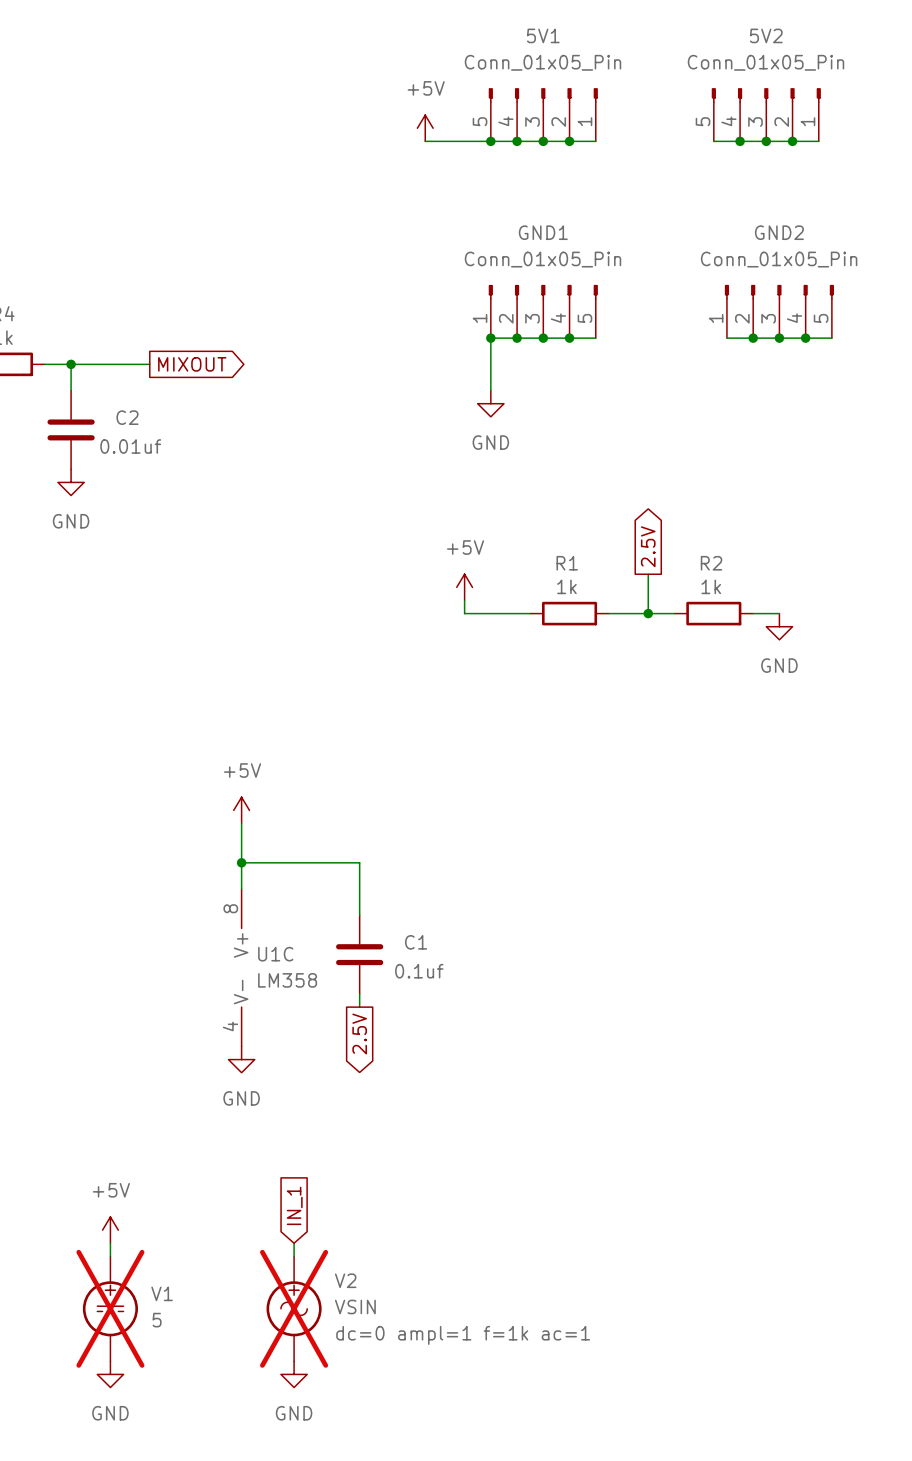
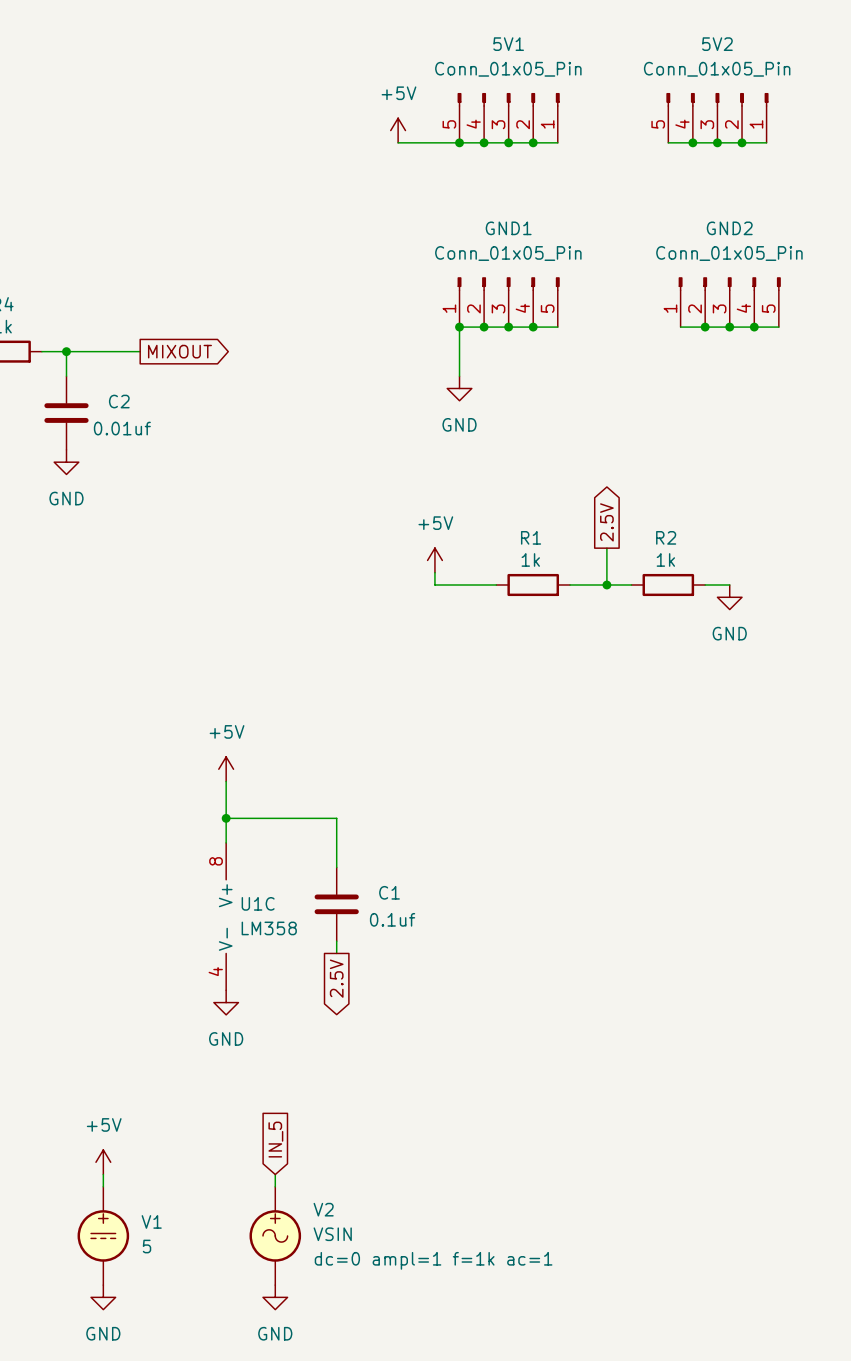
global label: IN_1 (294, 1205) -> IN_5 (275, 1139)
V1 do-not-place cross: (110, 1308) -> none
V2 do-not-place cross: (294, 1308) -> none

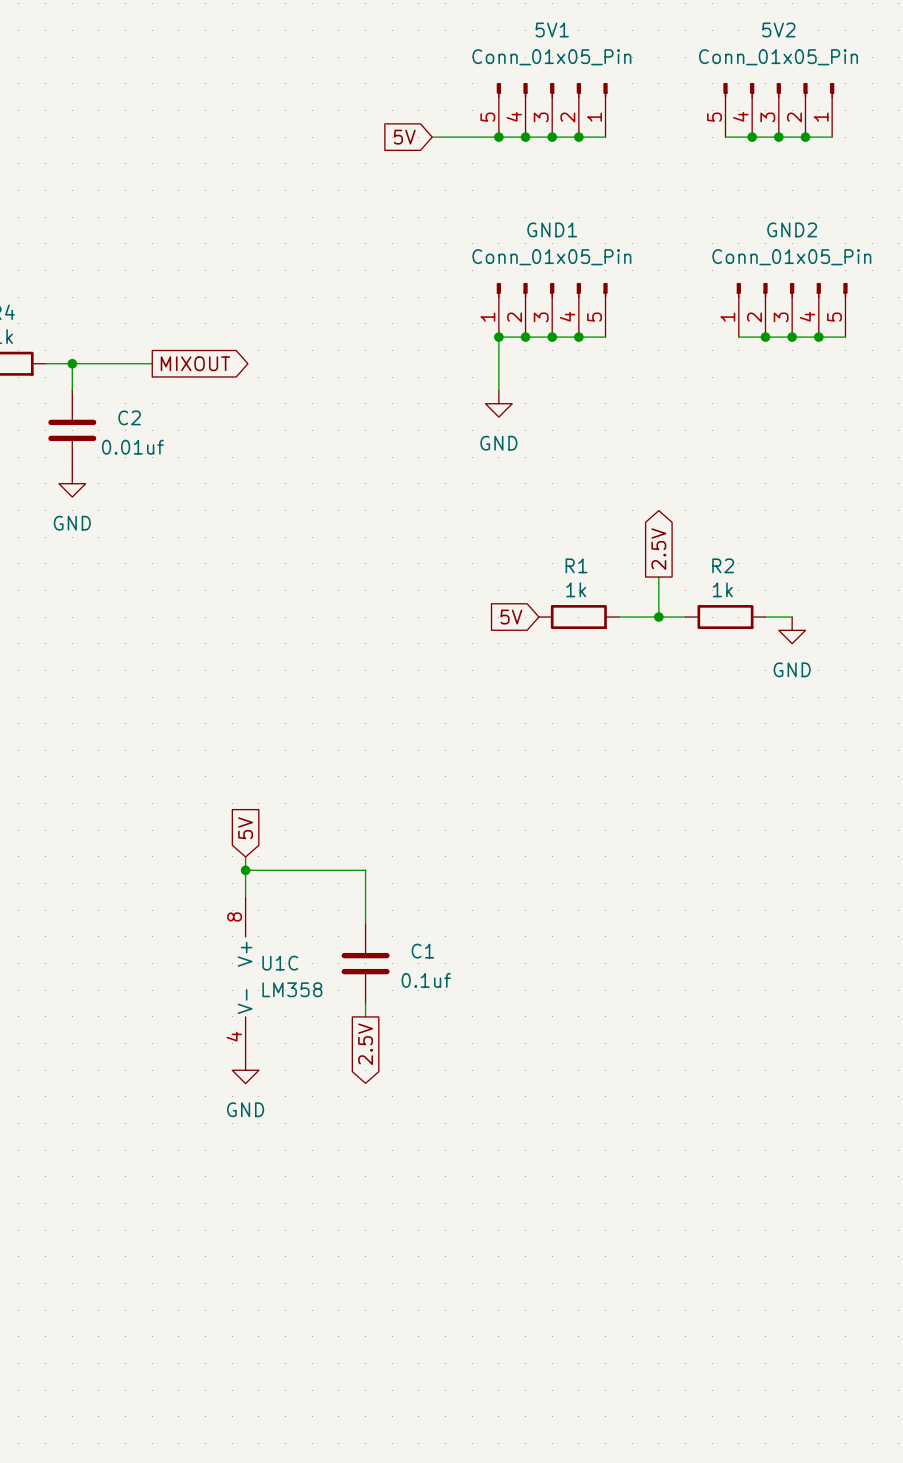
power symbol: +5V (398, 130) -> none
global label: none -> 5V (404, 137)
power symbol: +5V (434, 560) -> none
wire: (434, 572) (434, 585) (496, 585) -> none
global label: none -> 5V (511, 617)
power symbol: +5V (226, 769) -> none
global label: none -> 5V (245, 828)
wire: (226, 781) (226, 806) -> none
global label: IN_5 (275, 1139) -> none
power symbol: +5V (103, 1162) -> none
wire: (103, 1174) (103, 1186) -> none
wire: (275, 1174) (275, 1186) -> none
V1: 5 (103, 1235) -> none
V2: VSIN (275, 1235) -> none
power symbol: GND (103, 1297) -> none
power symbol: GND (275, 1297) -> none

